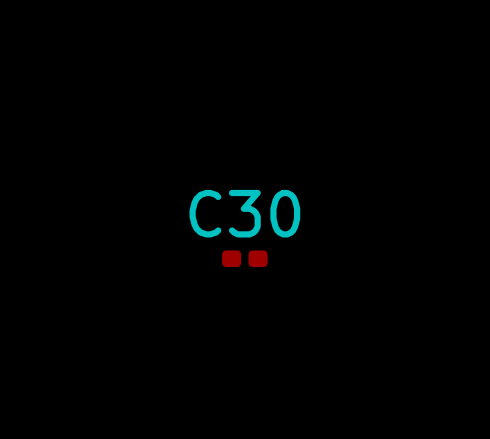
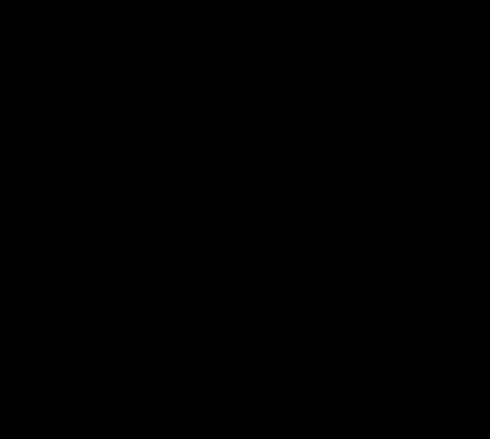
C30: (244, 258) -> none

